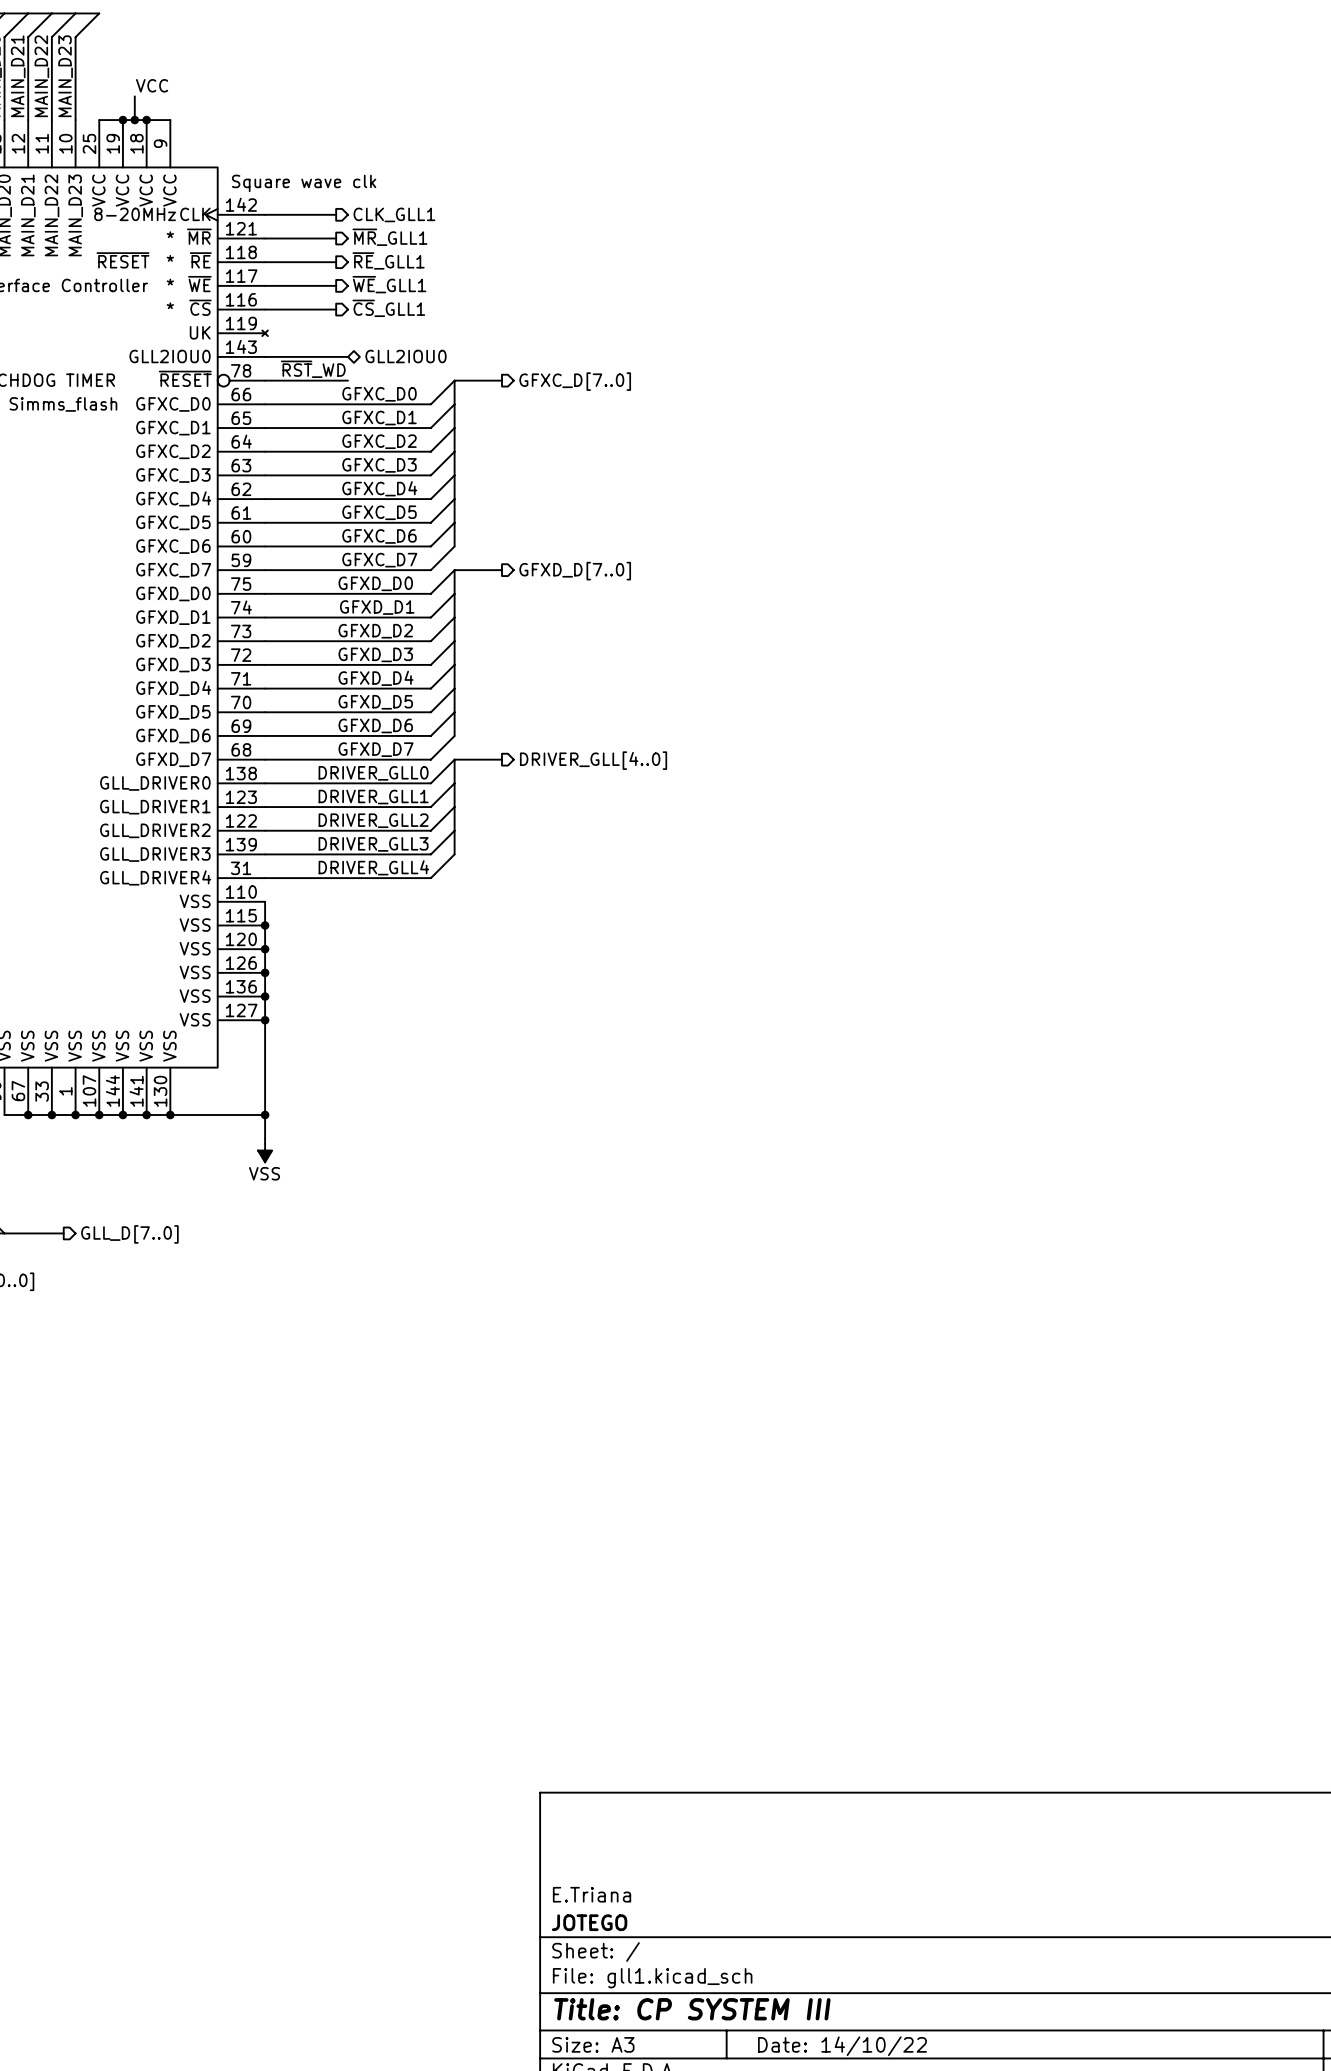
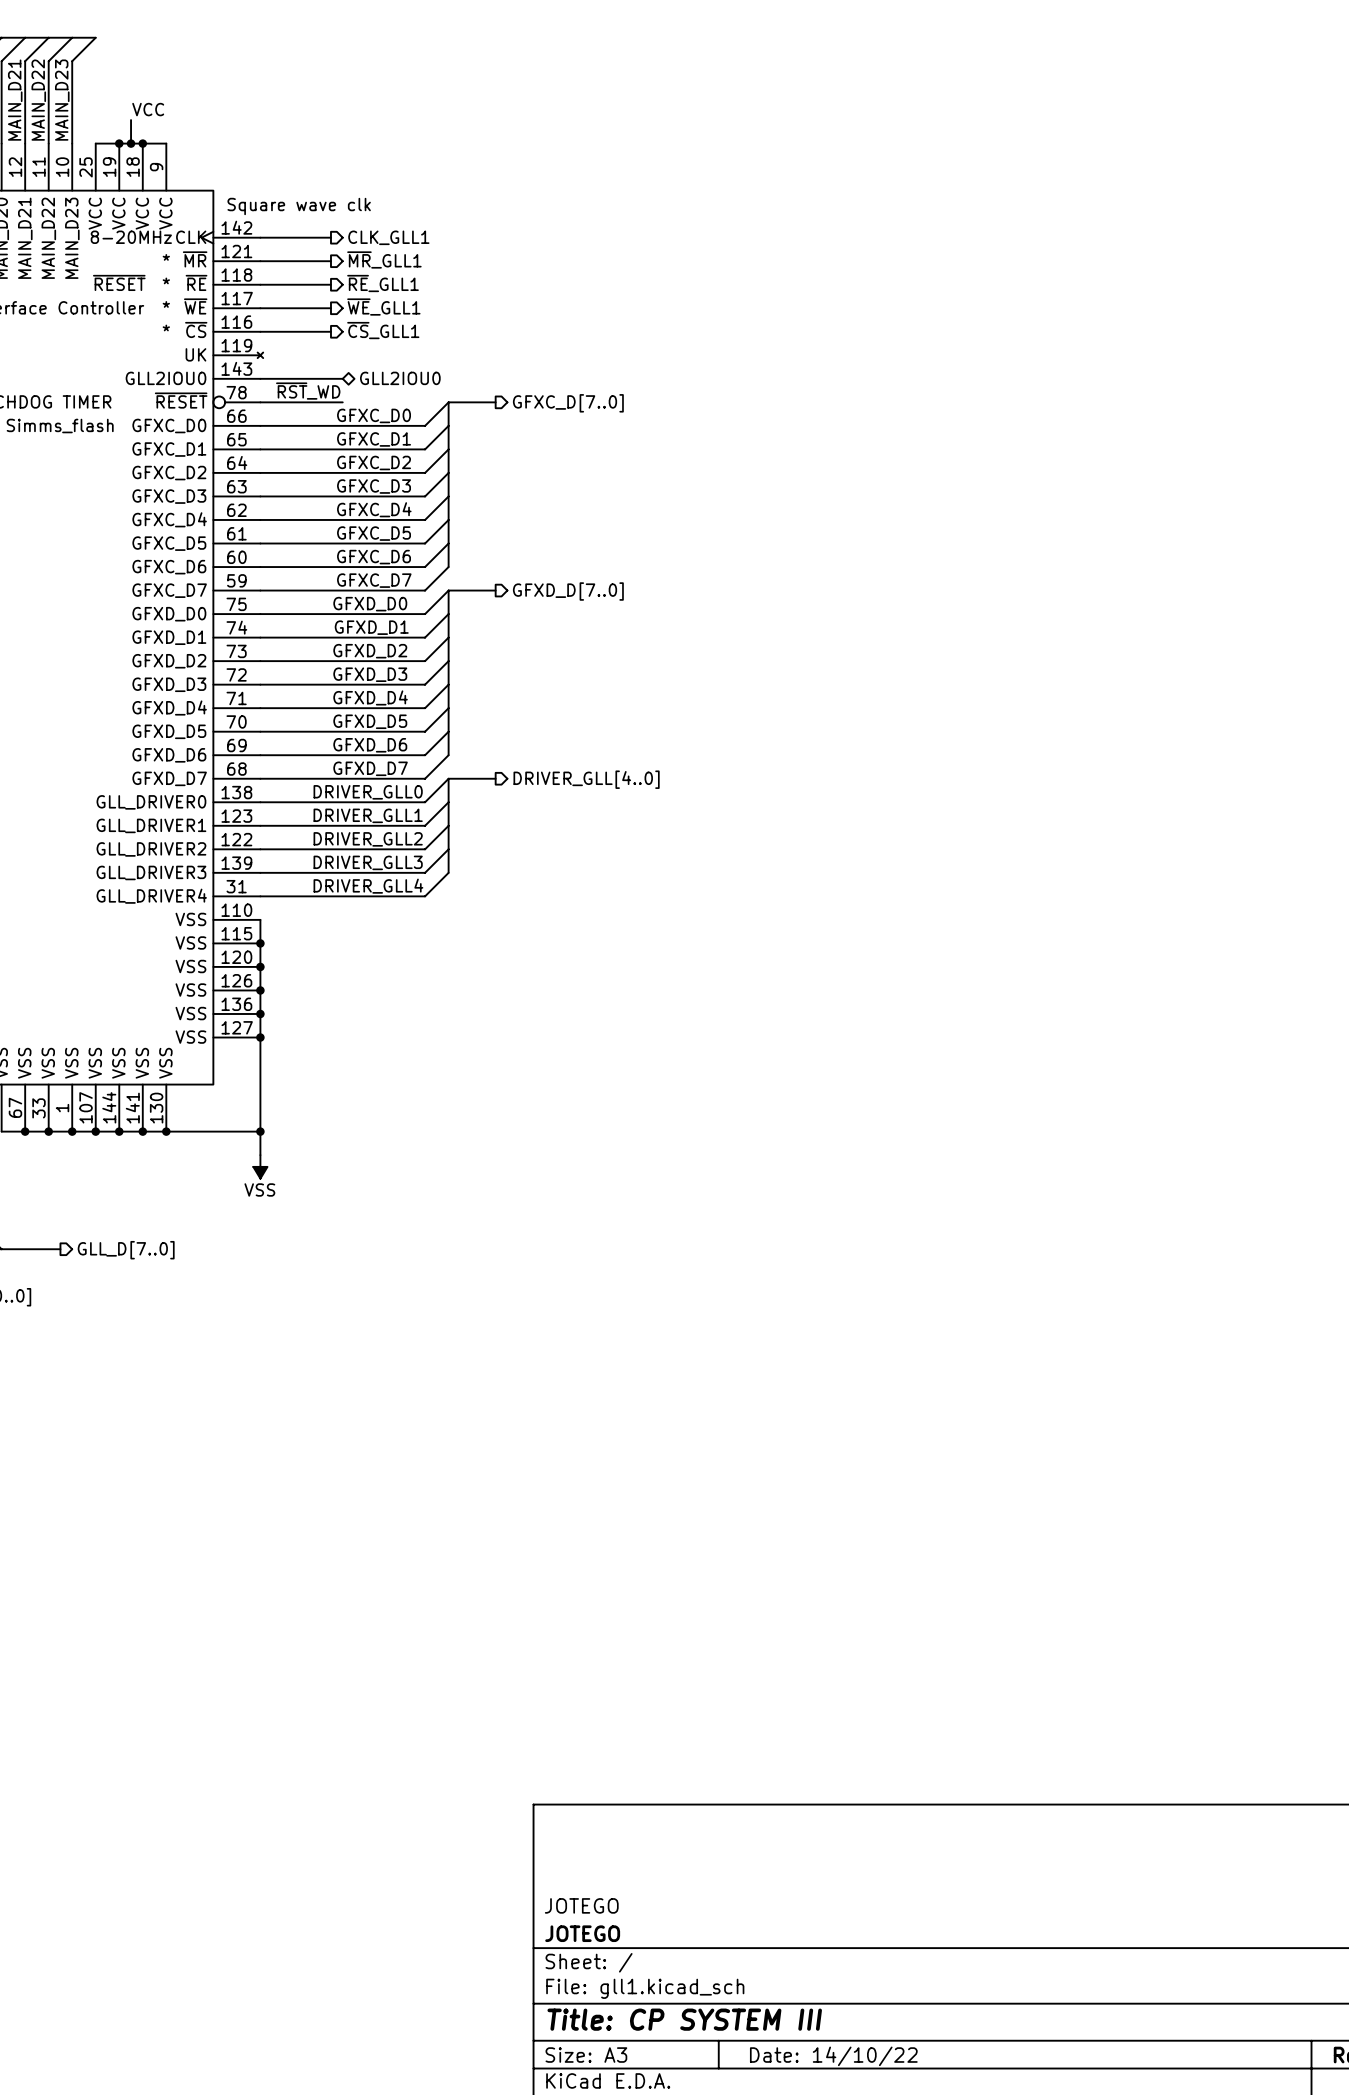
title block: E.Triana (592, 1894) -> JOTEGO (581, 1905)

